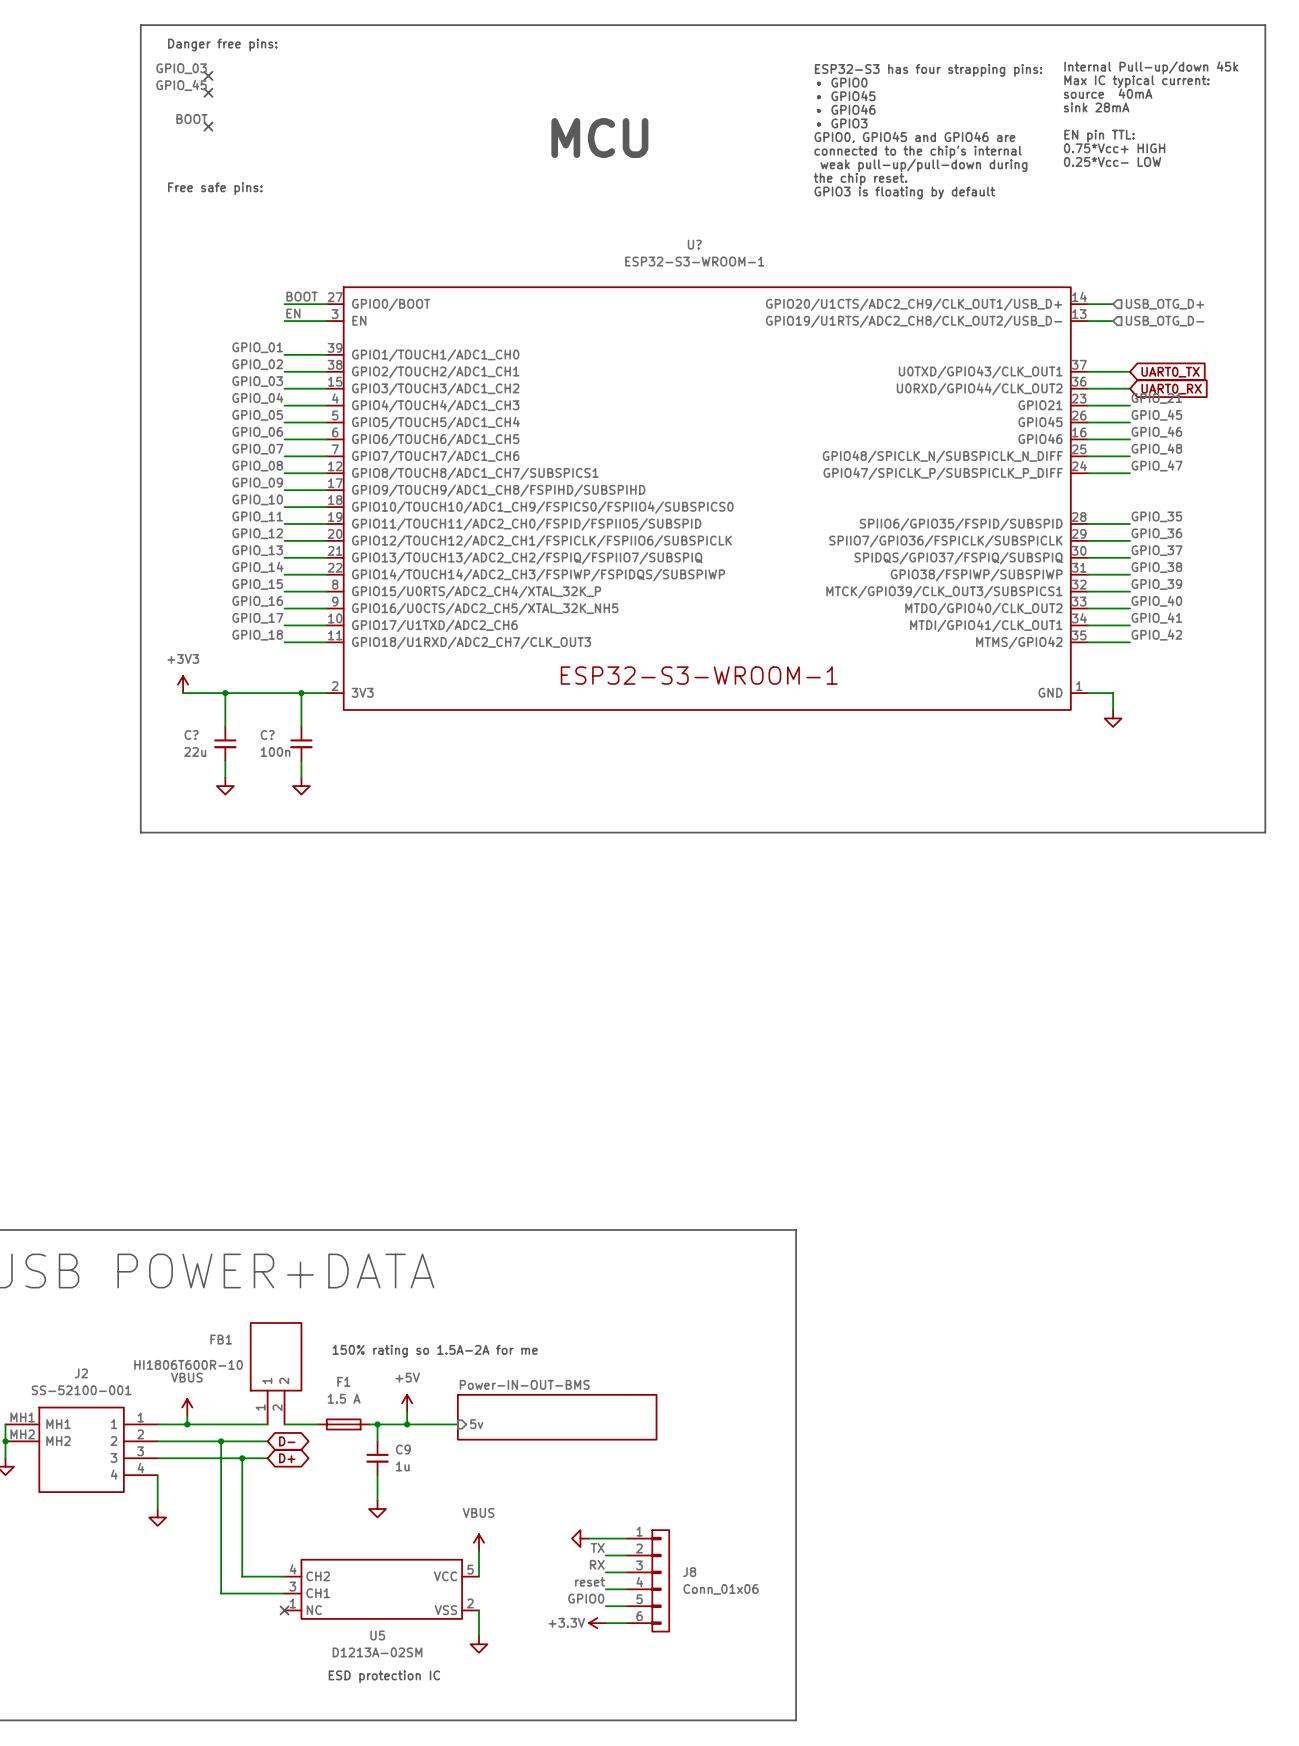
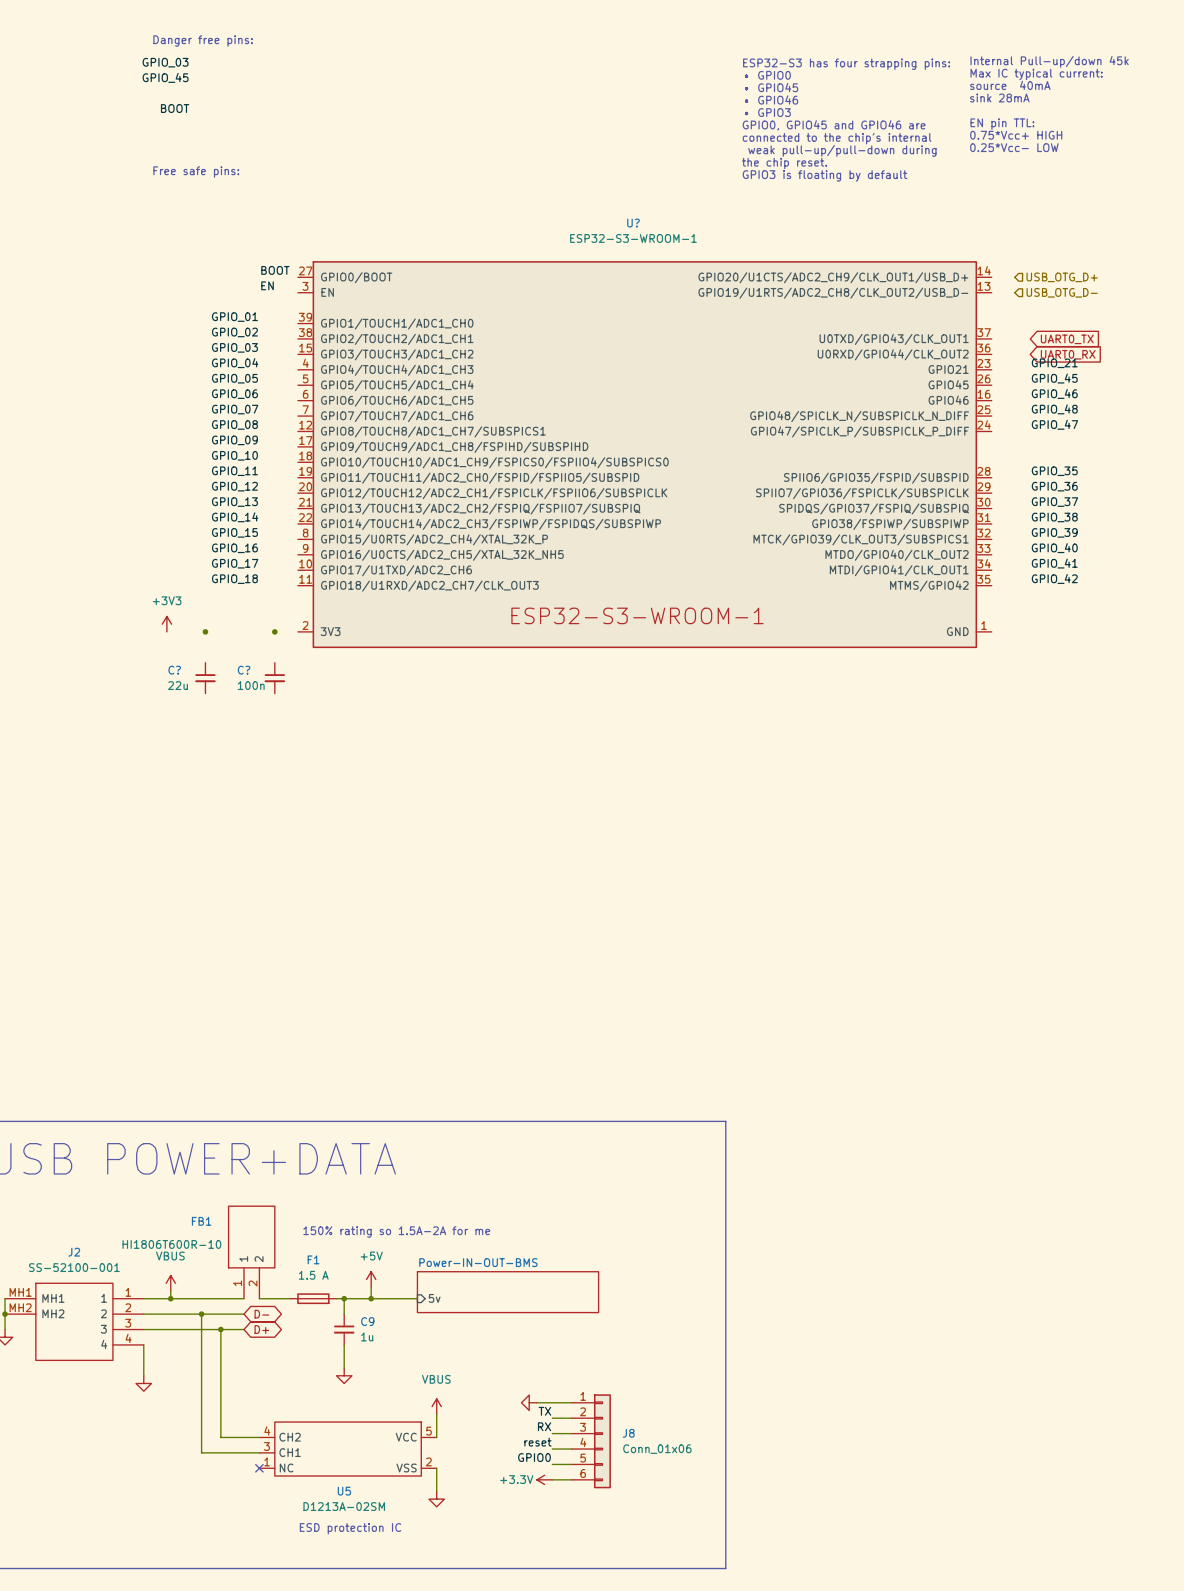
line: (140, 25) (1265, 25) (1265, 832) (140, 832) (140, 25) -> none
no-connect mark: (208, 75) -> none
no-connect mark: (208, 92) -> none
no-connect mark: (208, 126) -> none
text: MCU (599, 138) -> none
wire: (284, 304) (326, 304) -> none
wire: (1087, 304) (1113, 304) -> none
wire: (284, 321) (326, 321) -> none
wire: (1087, 321) (1113, 321) -> none
wire: (284, 354) (326, 354) -> none
wire: (284, 371) (326, 371) -> none
wire: (1087, 371) (1130, 371) -> none
wire: (284, 388) (326, 388) -> none
wire: (1087, 388) (1130, 388) -> none
wire: (284, 405) (326, 405) -> none
wire: (1087, 405) (1130, 405) -> none
wire: (284, 422) (326, 422) -> none
wire: (1087, 422) (1130, 422) -> none
wire: (284, 439) (326, 439) -> none
wire: (1087, 439) (1130, 439) -> none
wire: (284, 456) (326, 456) -> none
wire: (1087, 456) (1130, 456) -> none
wire: (284, 473) (326, 473) -> none
wire: (1087, 473) (1130, 473) -> none
wire: (284, 490) (326, 490) -> none
wire: (284, 507) (326, 507) -> none
wire: (284, 523) (326, 523) -> none
wire: (1087, 523) (1130, 523) -> none
wire: (284, 540) (326, 540) -> none
wire: (1087, 540) (1130, 540) -> none
wire: (284, 557) (326, 557) -> none
wire: (1087, 557) (1130, 557) -> none
wire: (284, 574) (326, 574) -> none
wire: (1087, 574) (1130, 574) -> none
wire: (284, 591) (326, 591) -> none
wire: (1087, 591) (1130, 591) -> none
wire: (284, 608) (326, 608) -> none
wire: (1087, 608) (1130, 608) -> none
wire: (284, 625) (326, 625) -> none
wire: (1087, 625) (1130, 625) -> none
wire: (284, 642) (326, 642) -> none
wire: (1087, 642) (1130, 642) -> none
wire: (183, 693) (326, 693) -> none
wire: (225, 693) (225, 726) -> none
wire: (301, 693) (301, 726) -> none
wire: (1087, 693) (1113, 693) (1113, 709) -> none
power symbol: (1113, 718) -> none
wire: (225, 760) (225, 777) -> none
wire: (301, 760) (301, 777) -> none
power symbol: (225, 786) -> none
power symbol: (301, 786) -> none

